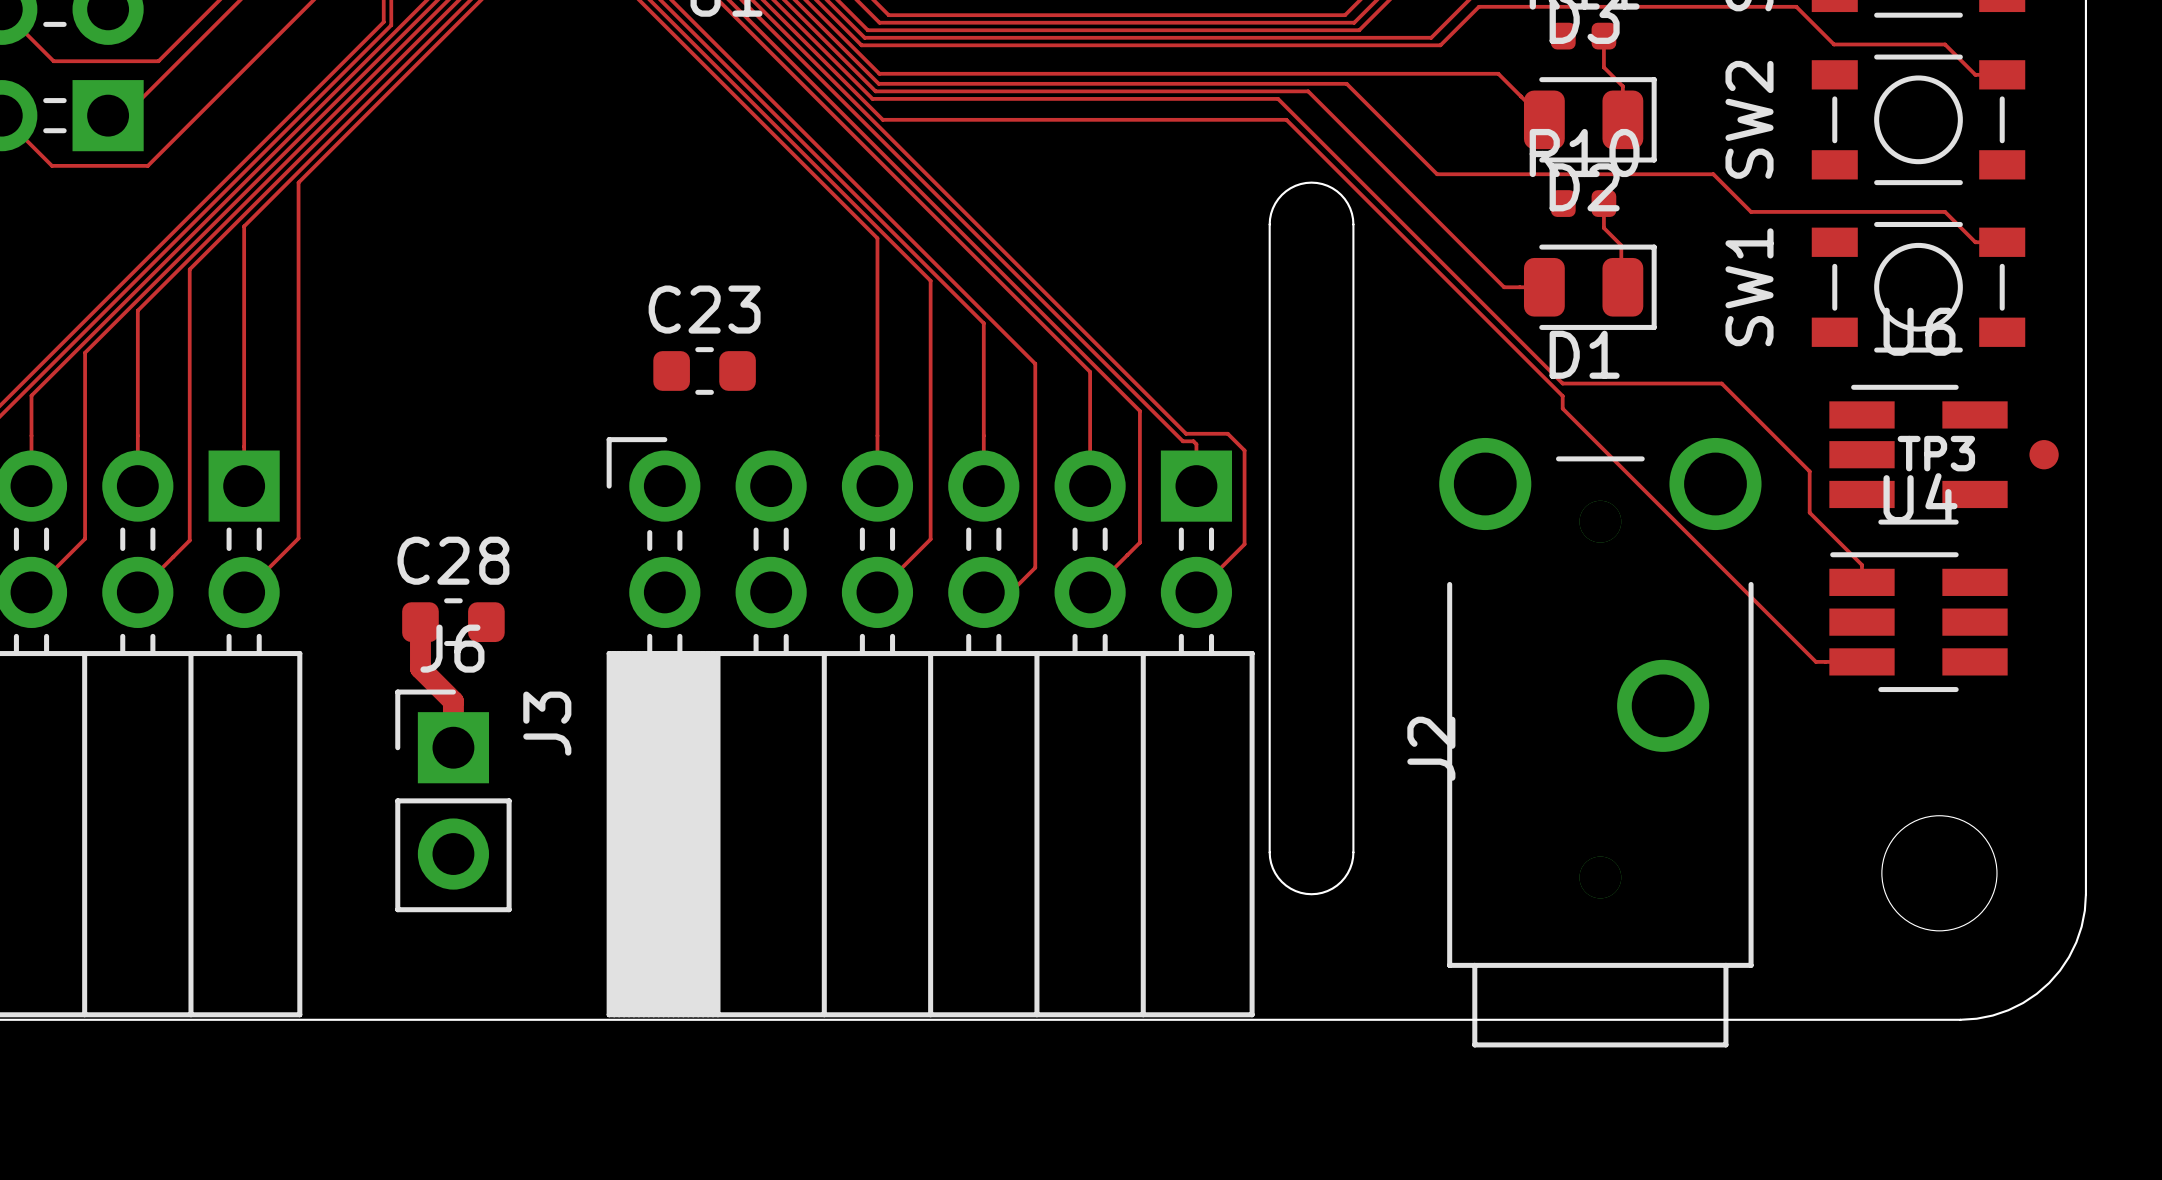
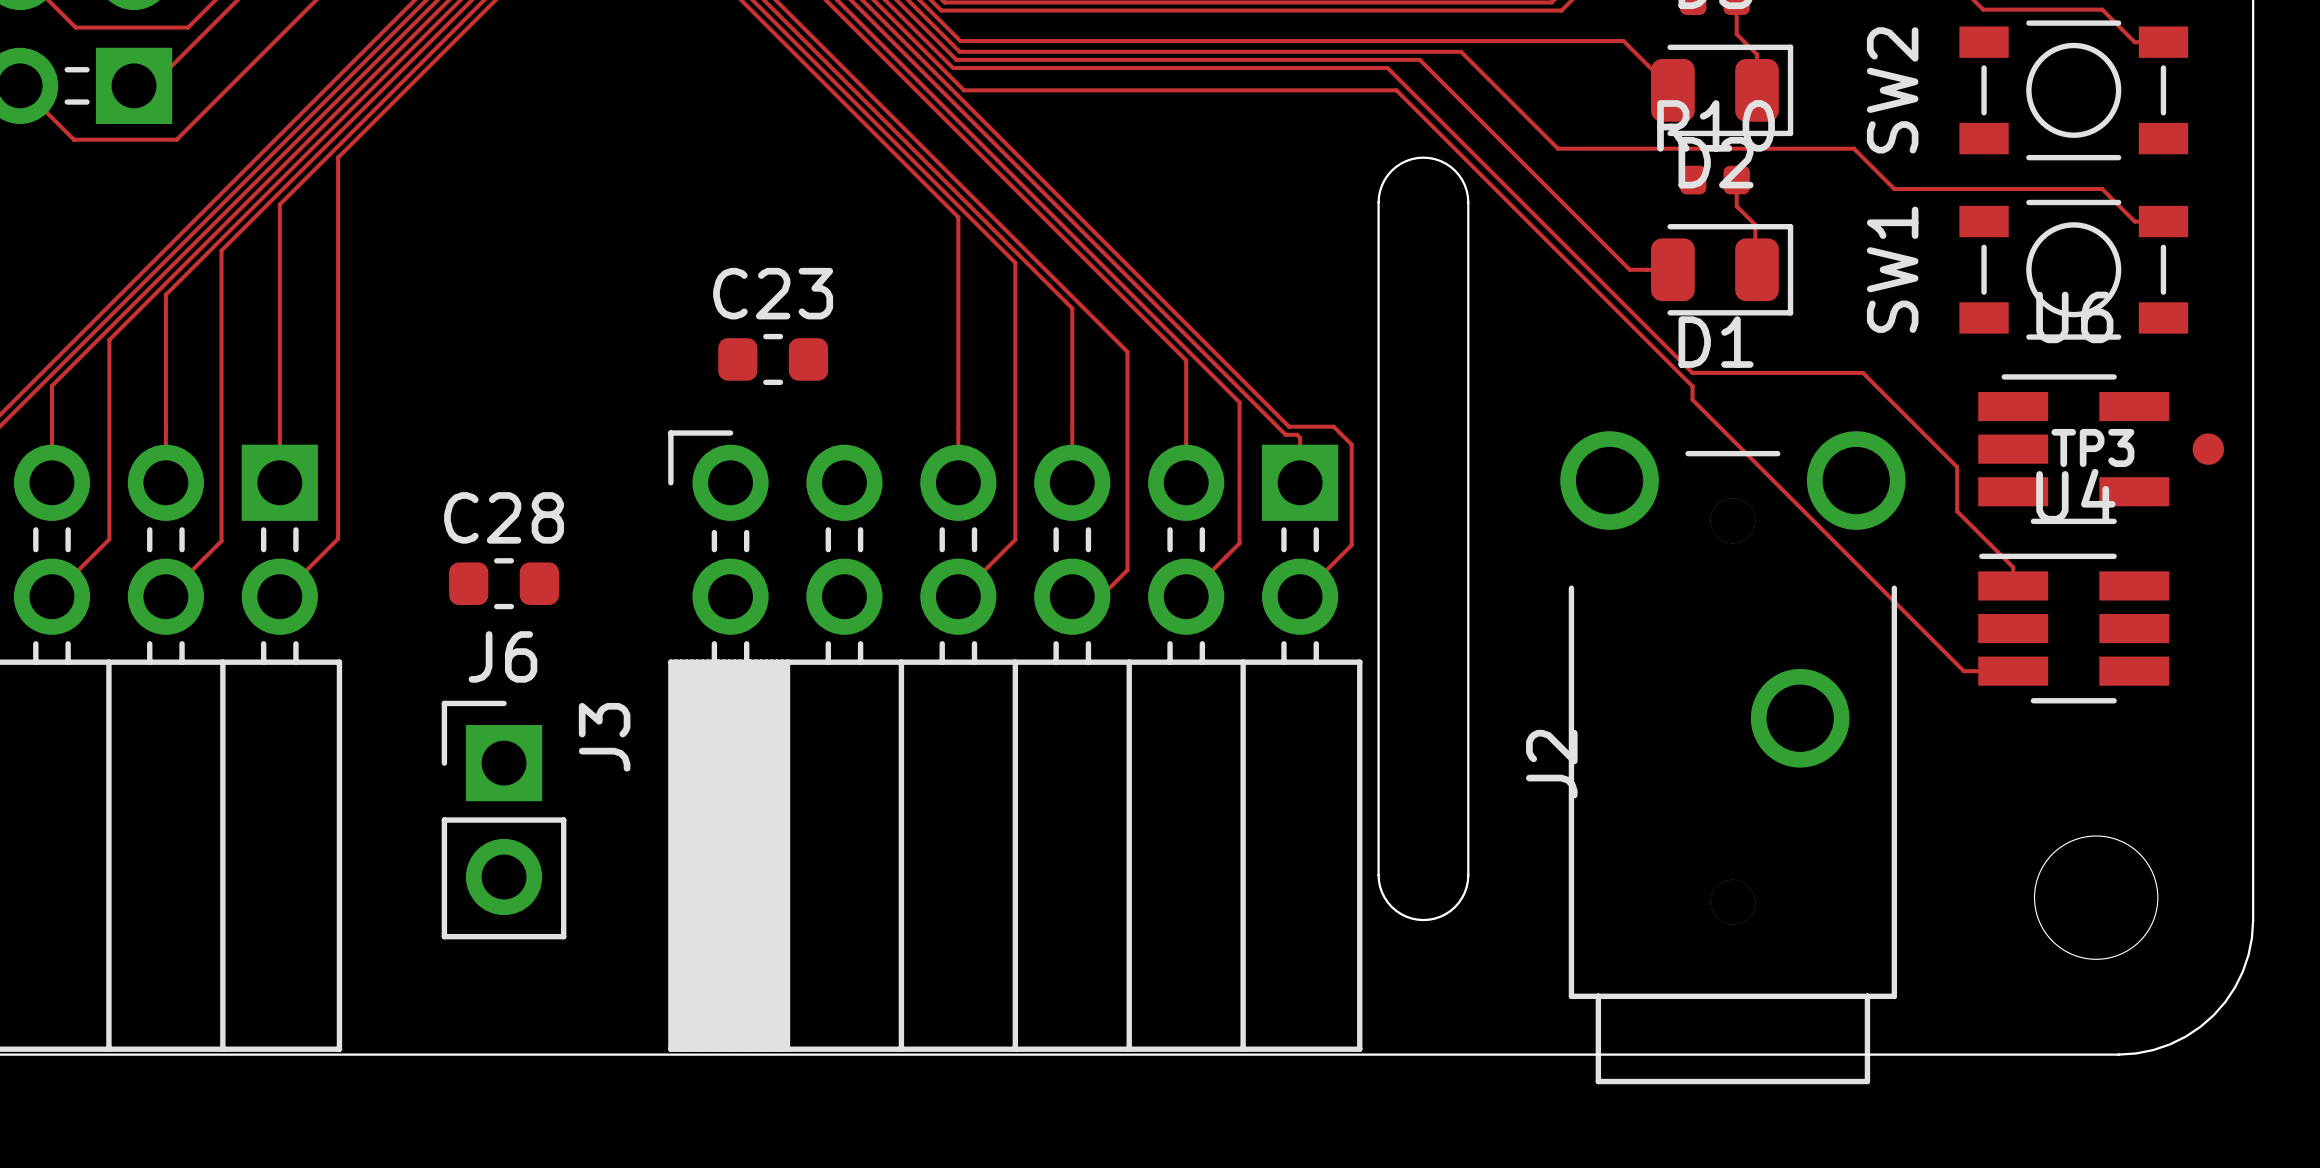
track: (420, 622) (420, 668) (453, 701) (453, 747) -> none
C28 position: (453, 622) -> (504, 583)

